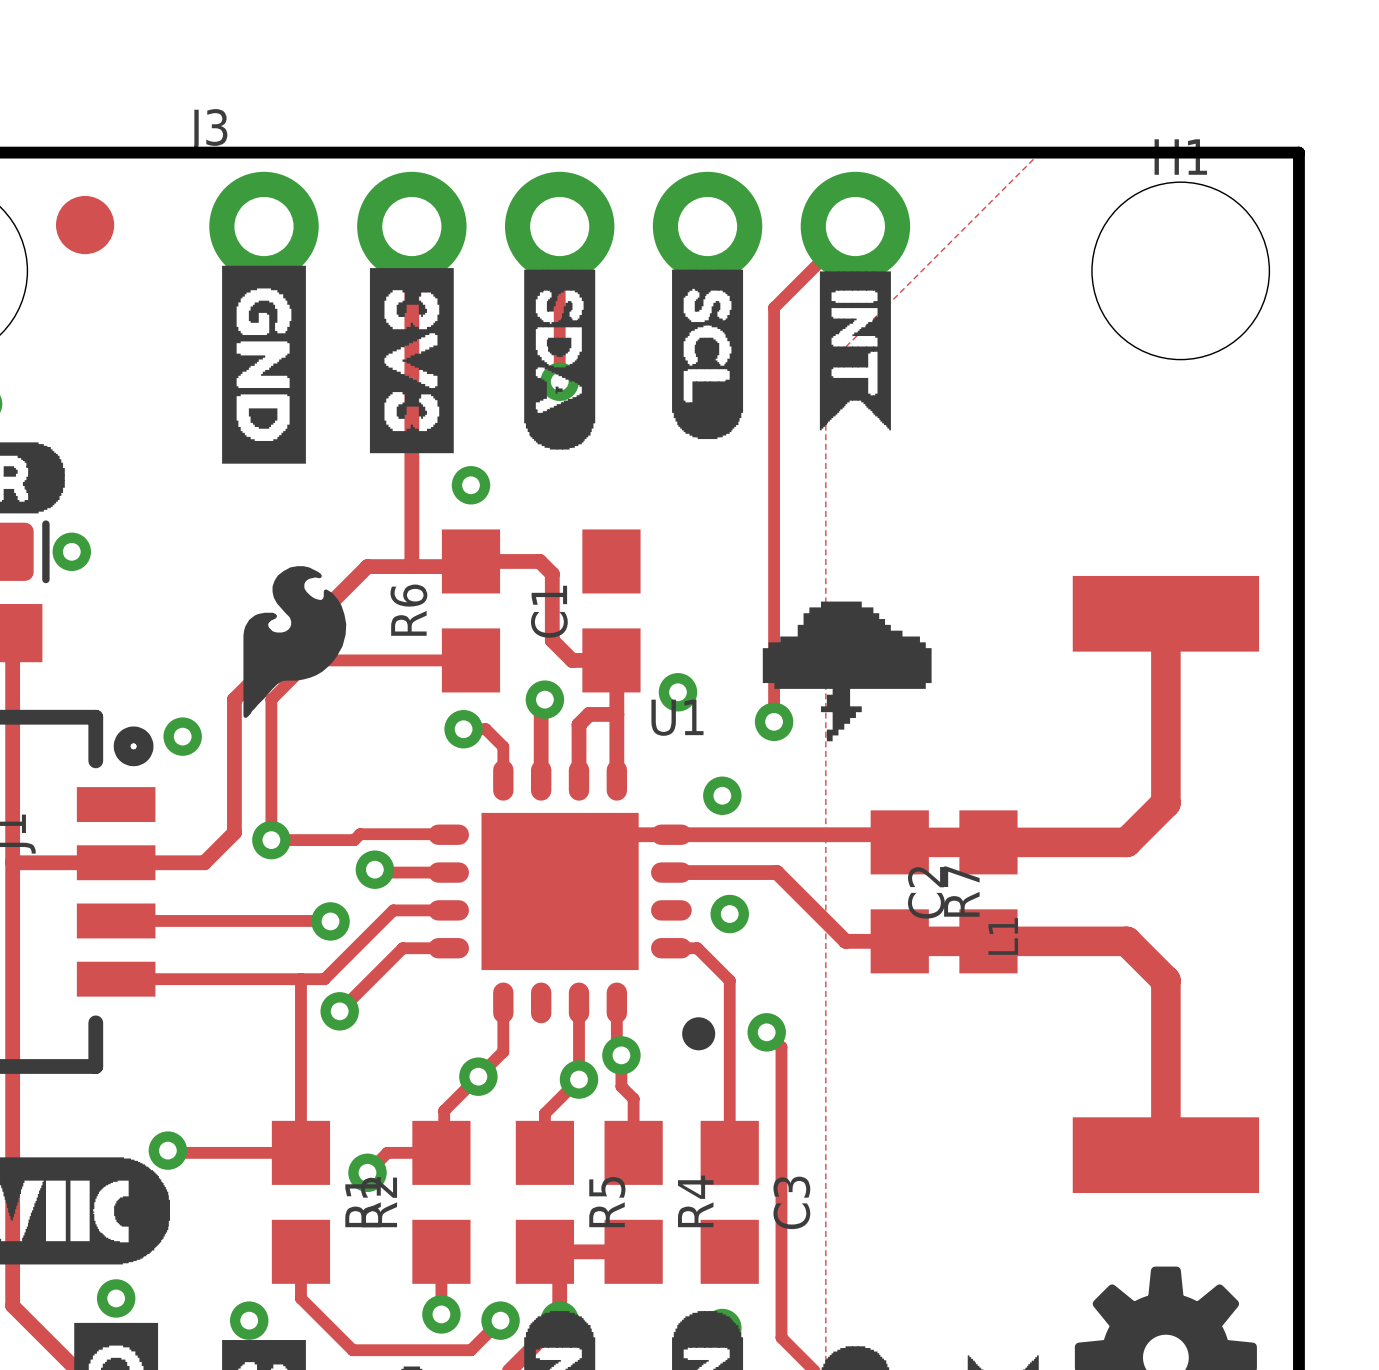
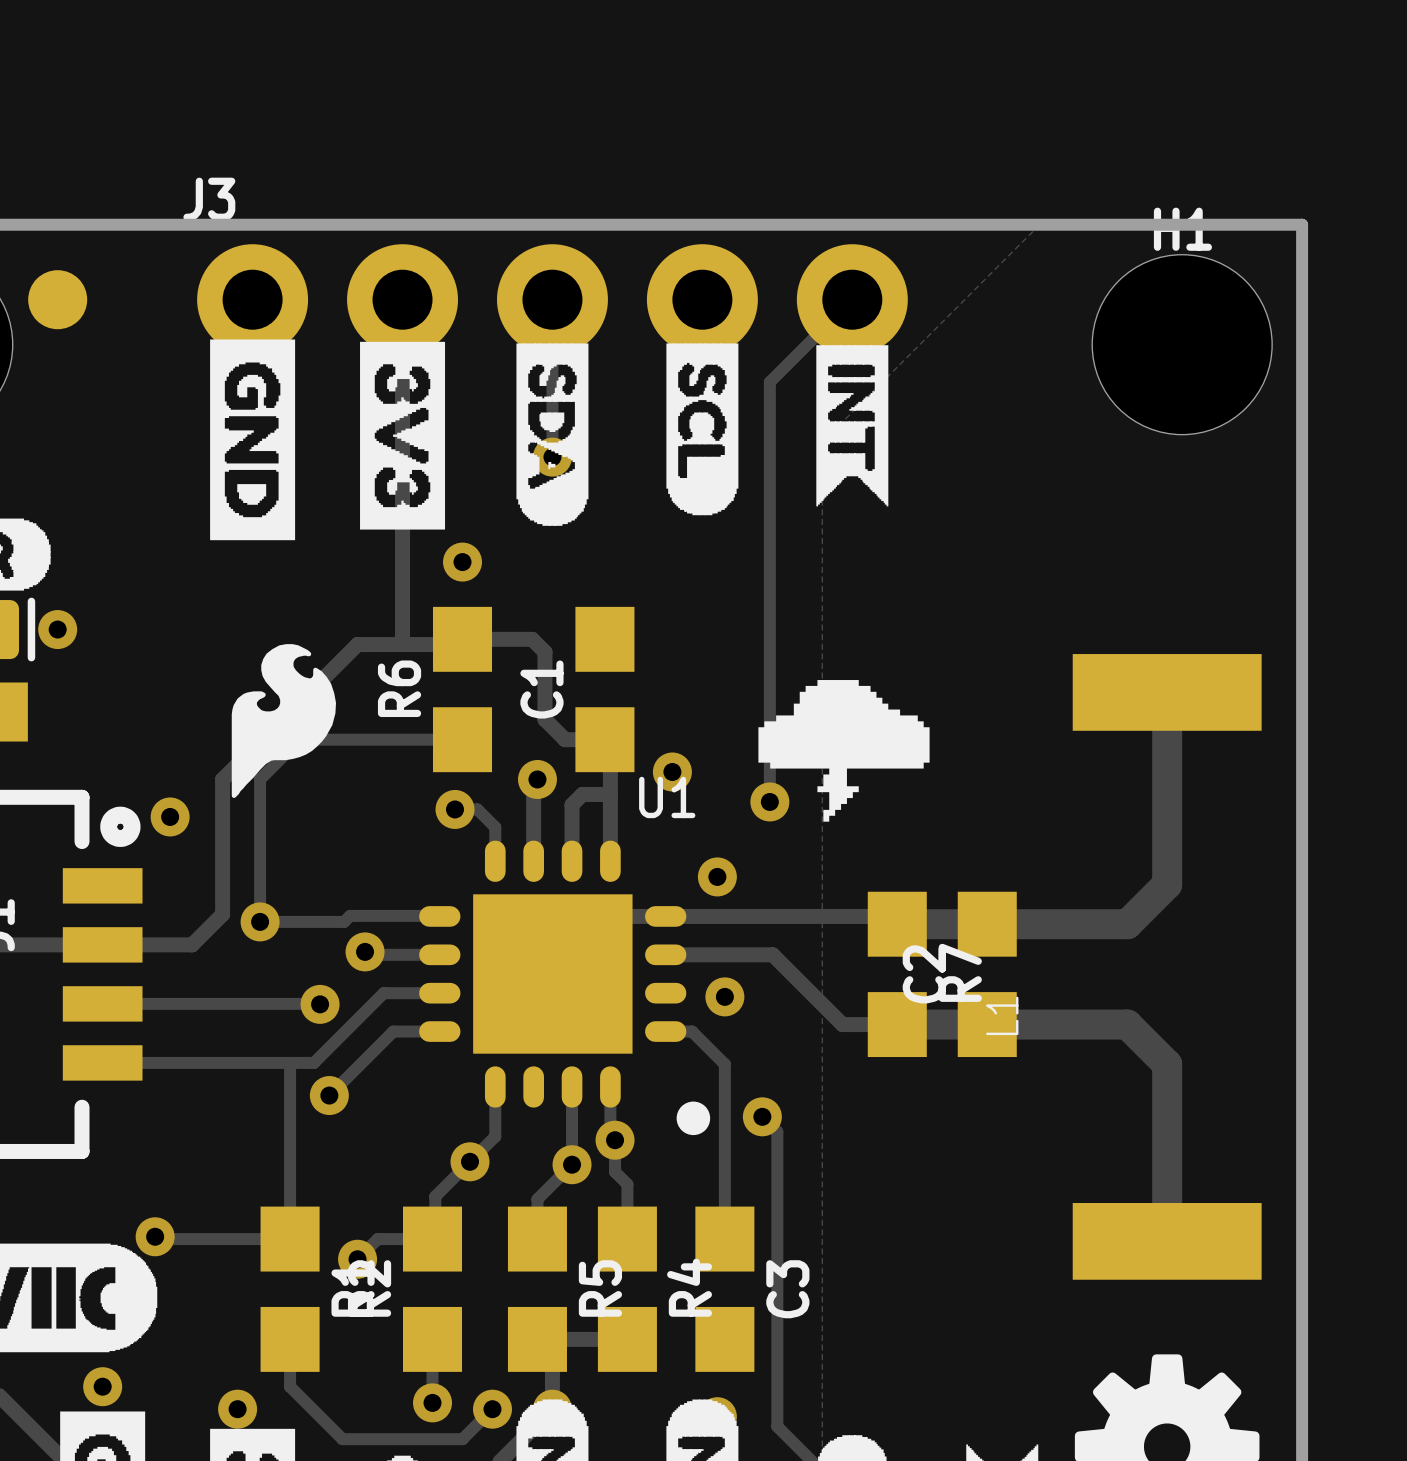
part position: (85, 225) -> (57, 299)

